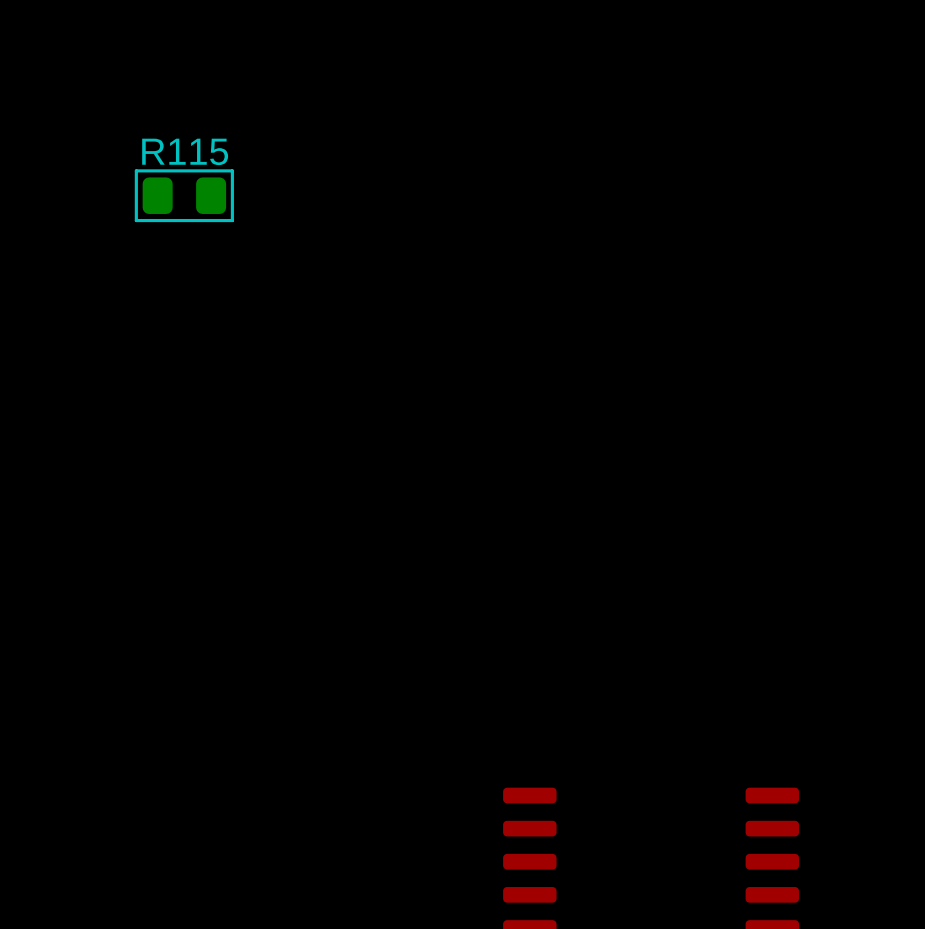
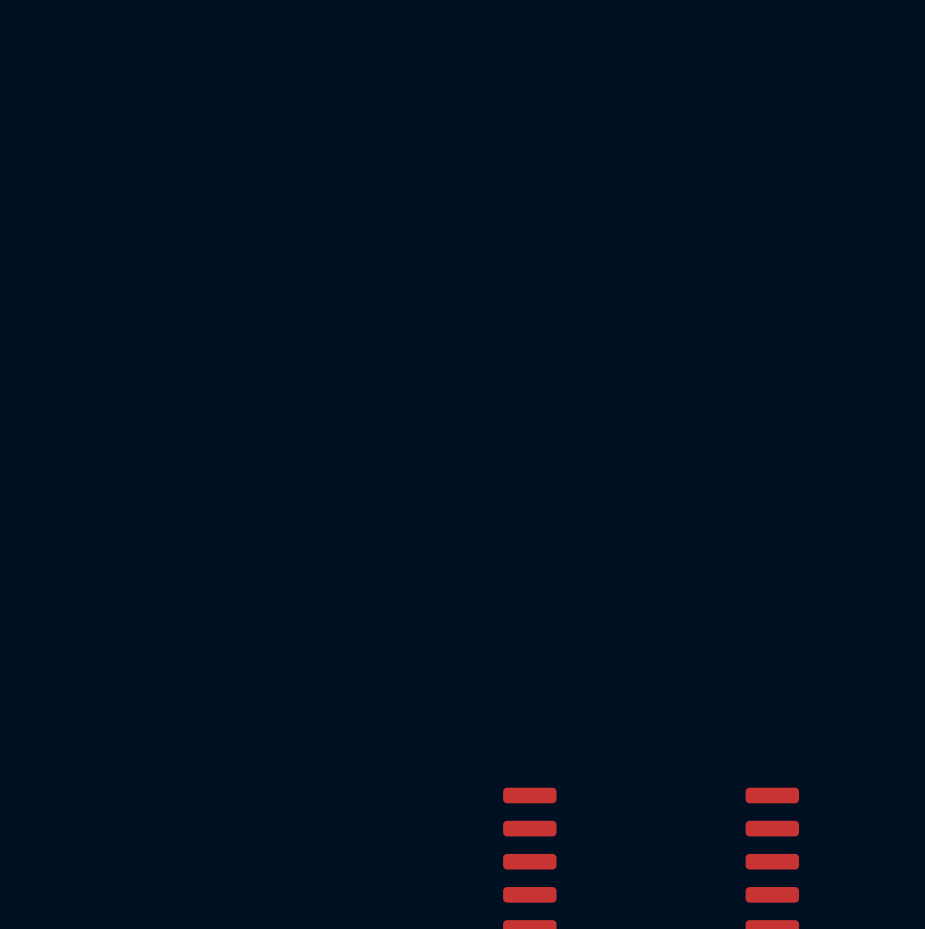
R115: (184, 195) -> none

